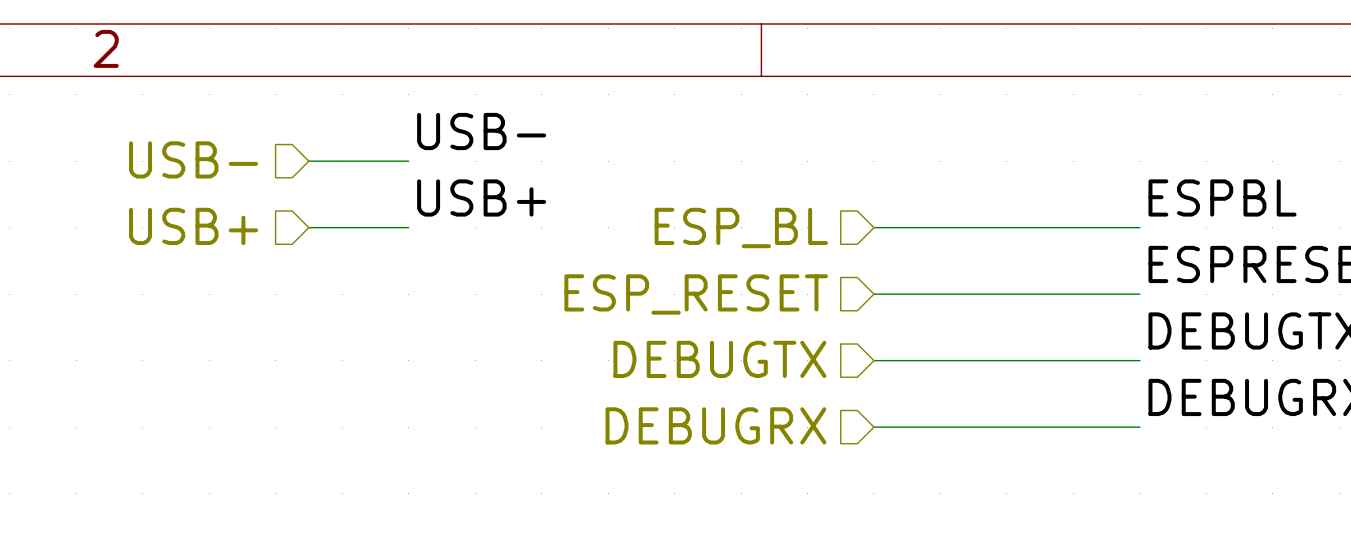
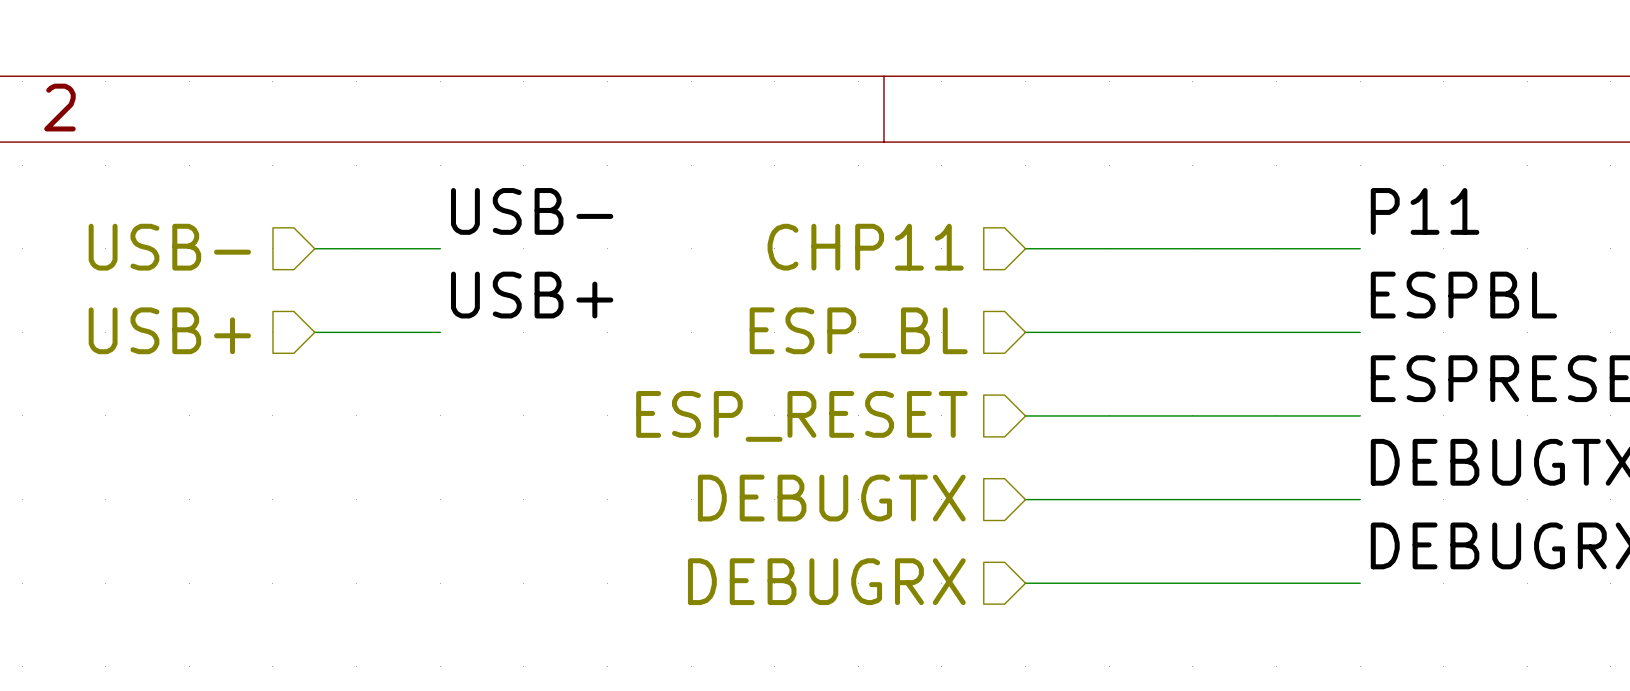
label: none -> P11 (1425, 211)
hierarchical label: none -> CHP11 (865, 247)
wire: none -> (1025, 248) (1360, 248)

